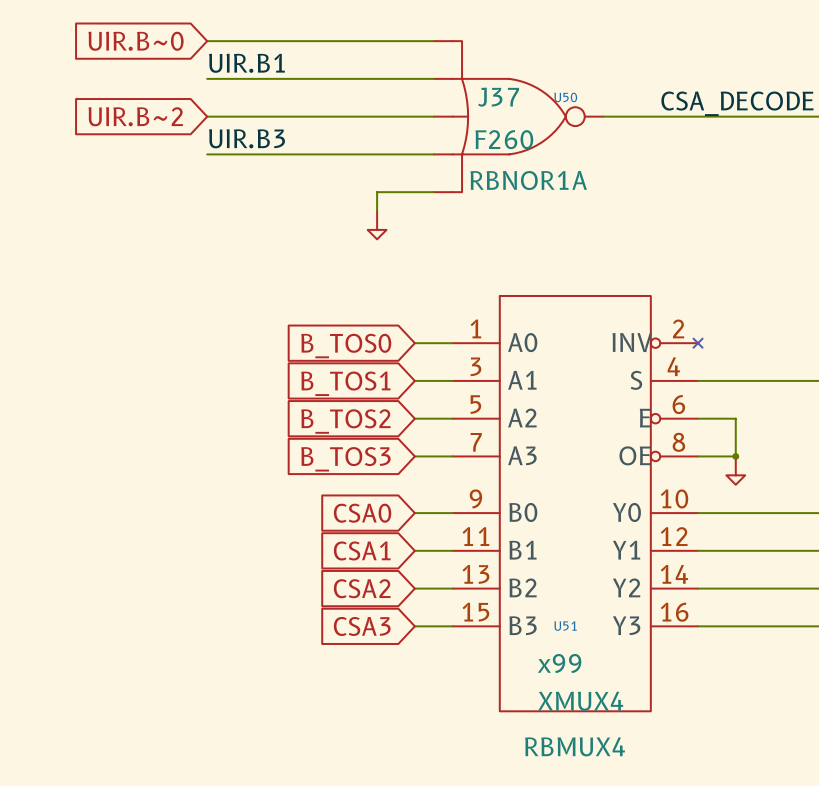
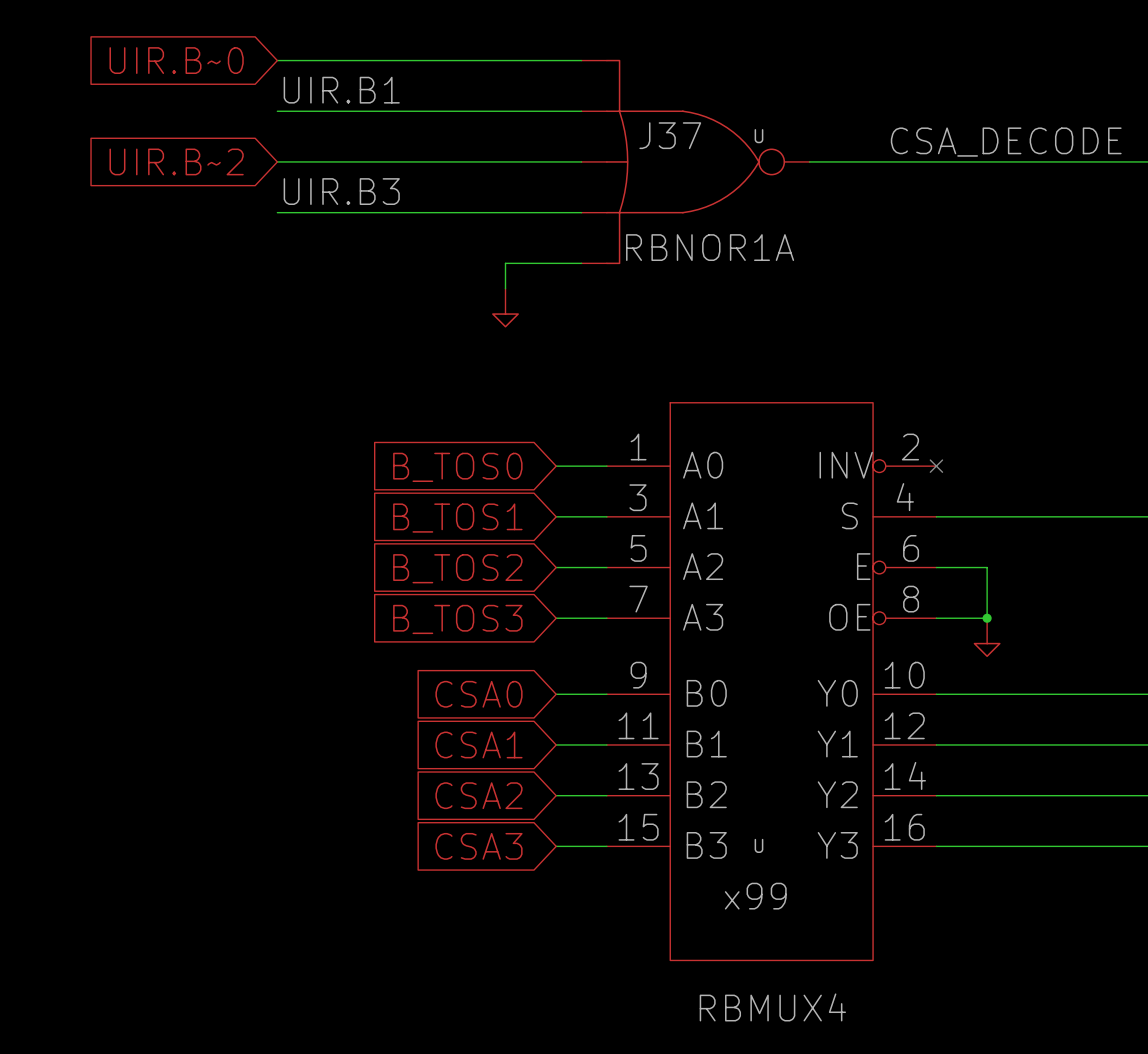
U50 name: U50 (565, 97) -> U (758, 136)
U50 value: F260 (504, 139) -> none
U51 name: U51 (565, 626) -> U (758, 845)
U51 value: XMUX4 (580, 701) -> none

